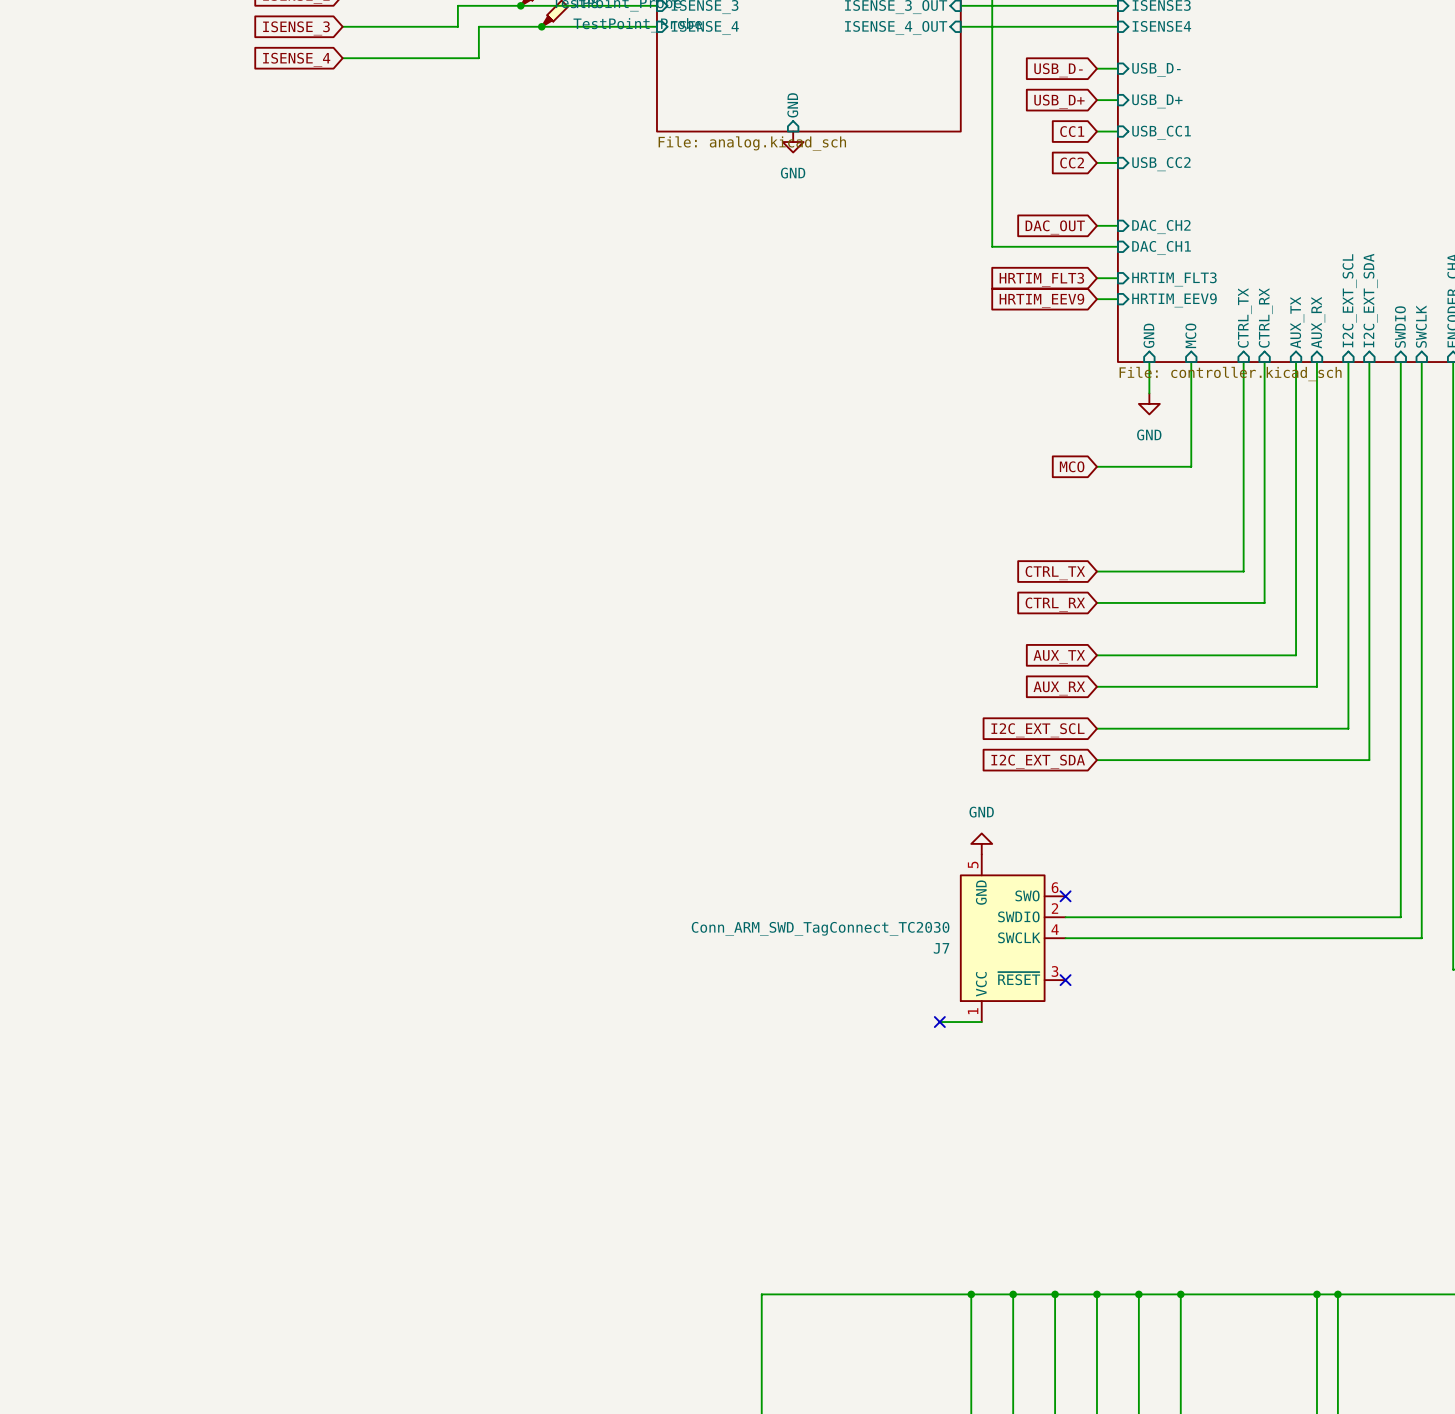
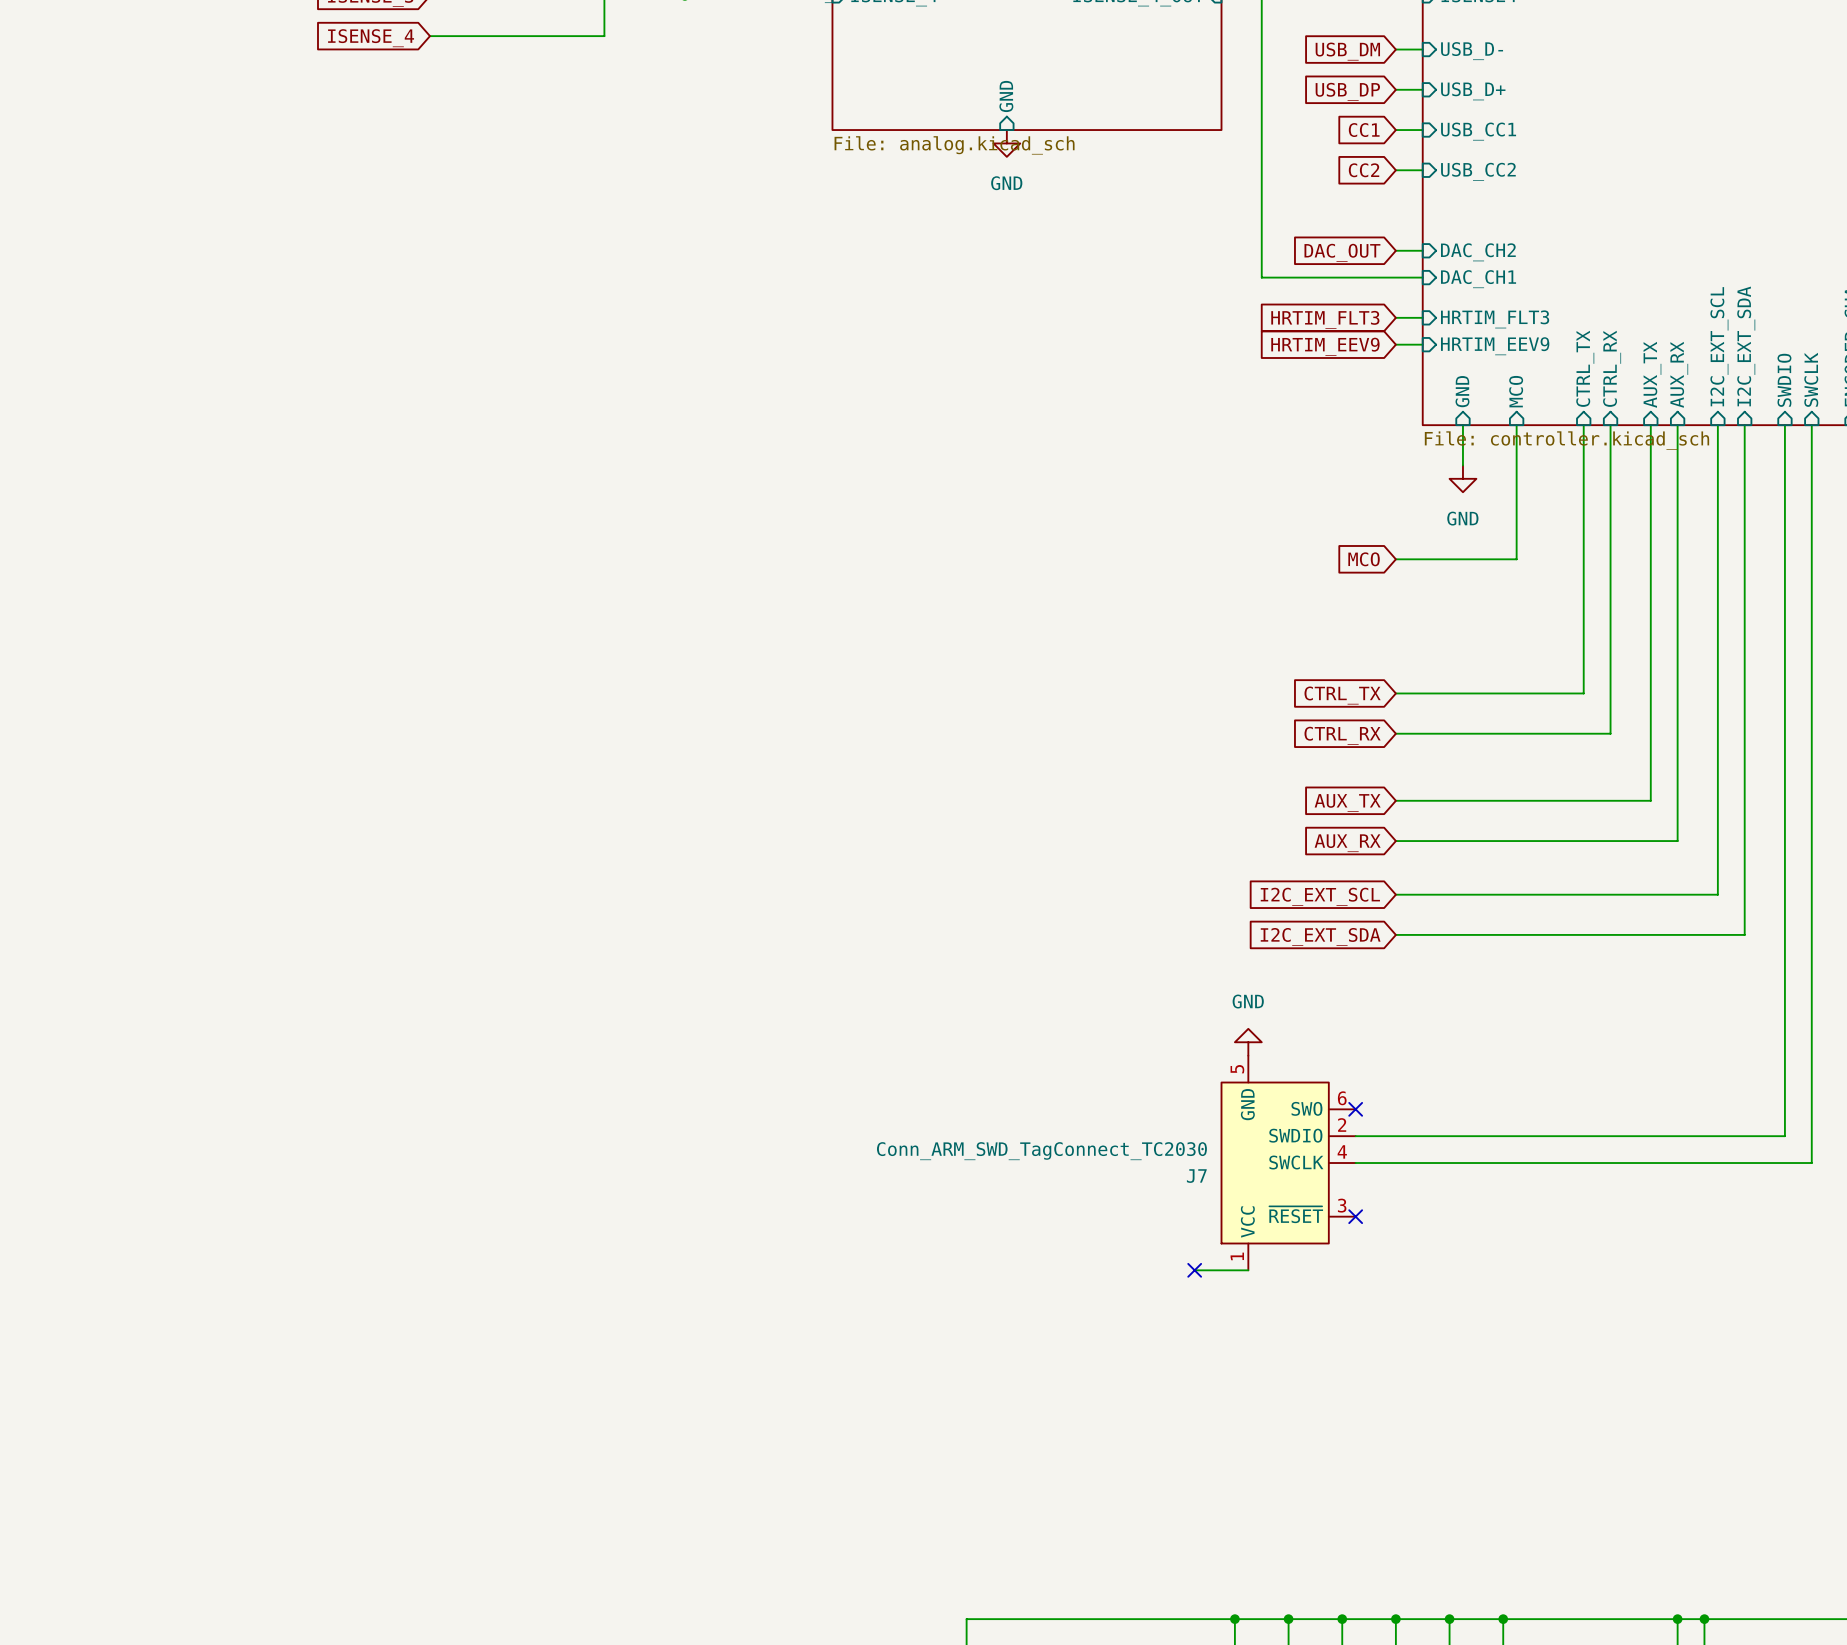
global label: USB_D- (1058, 70) -> USB_DM (1347, 51)
global label: USB_D+ (1059, 101) -> USB_DP (1347, 91)

